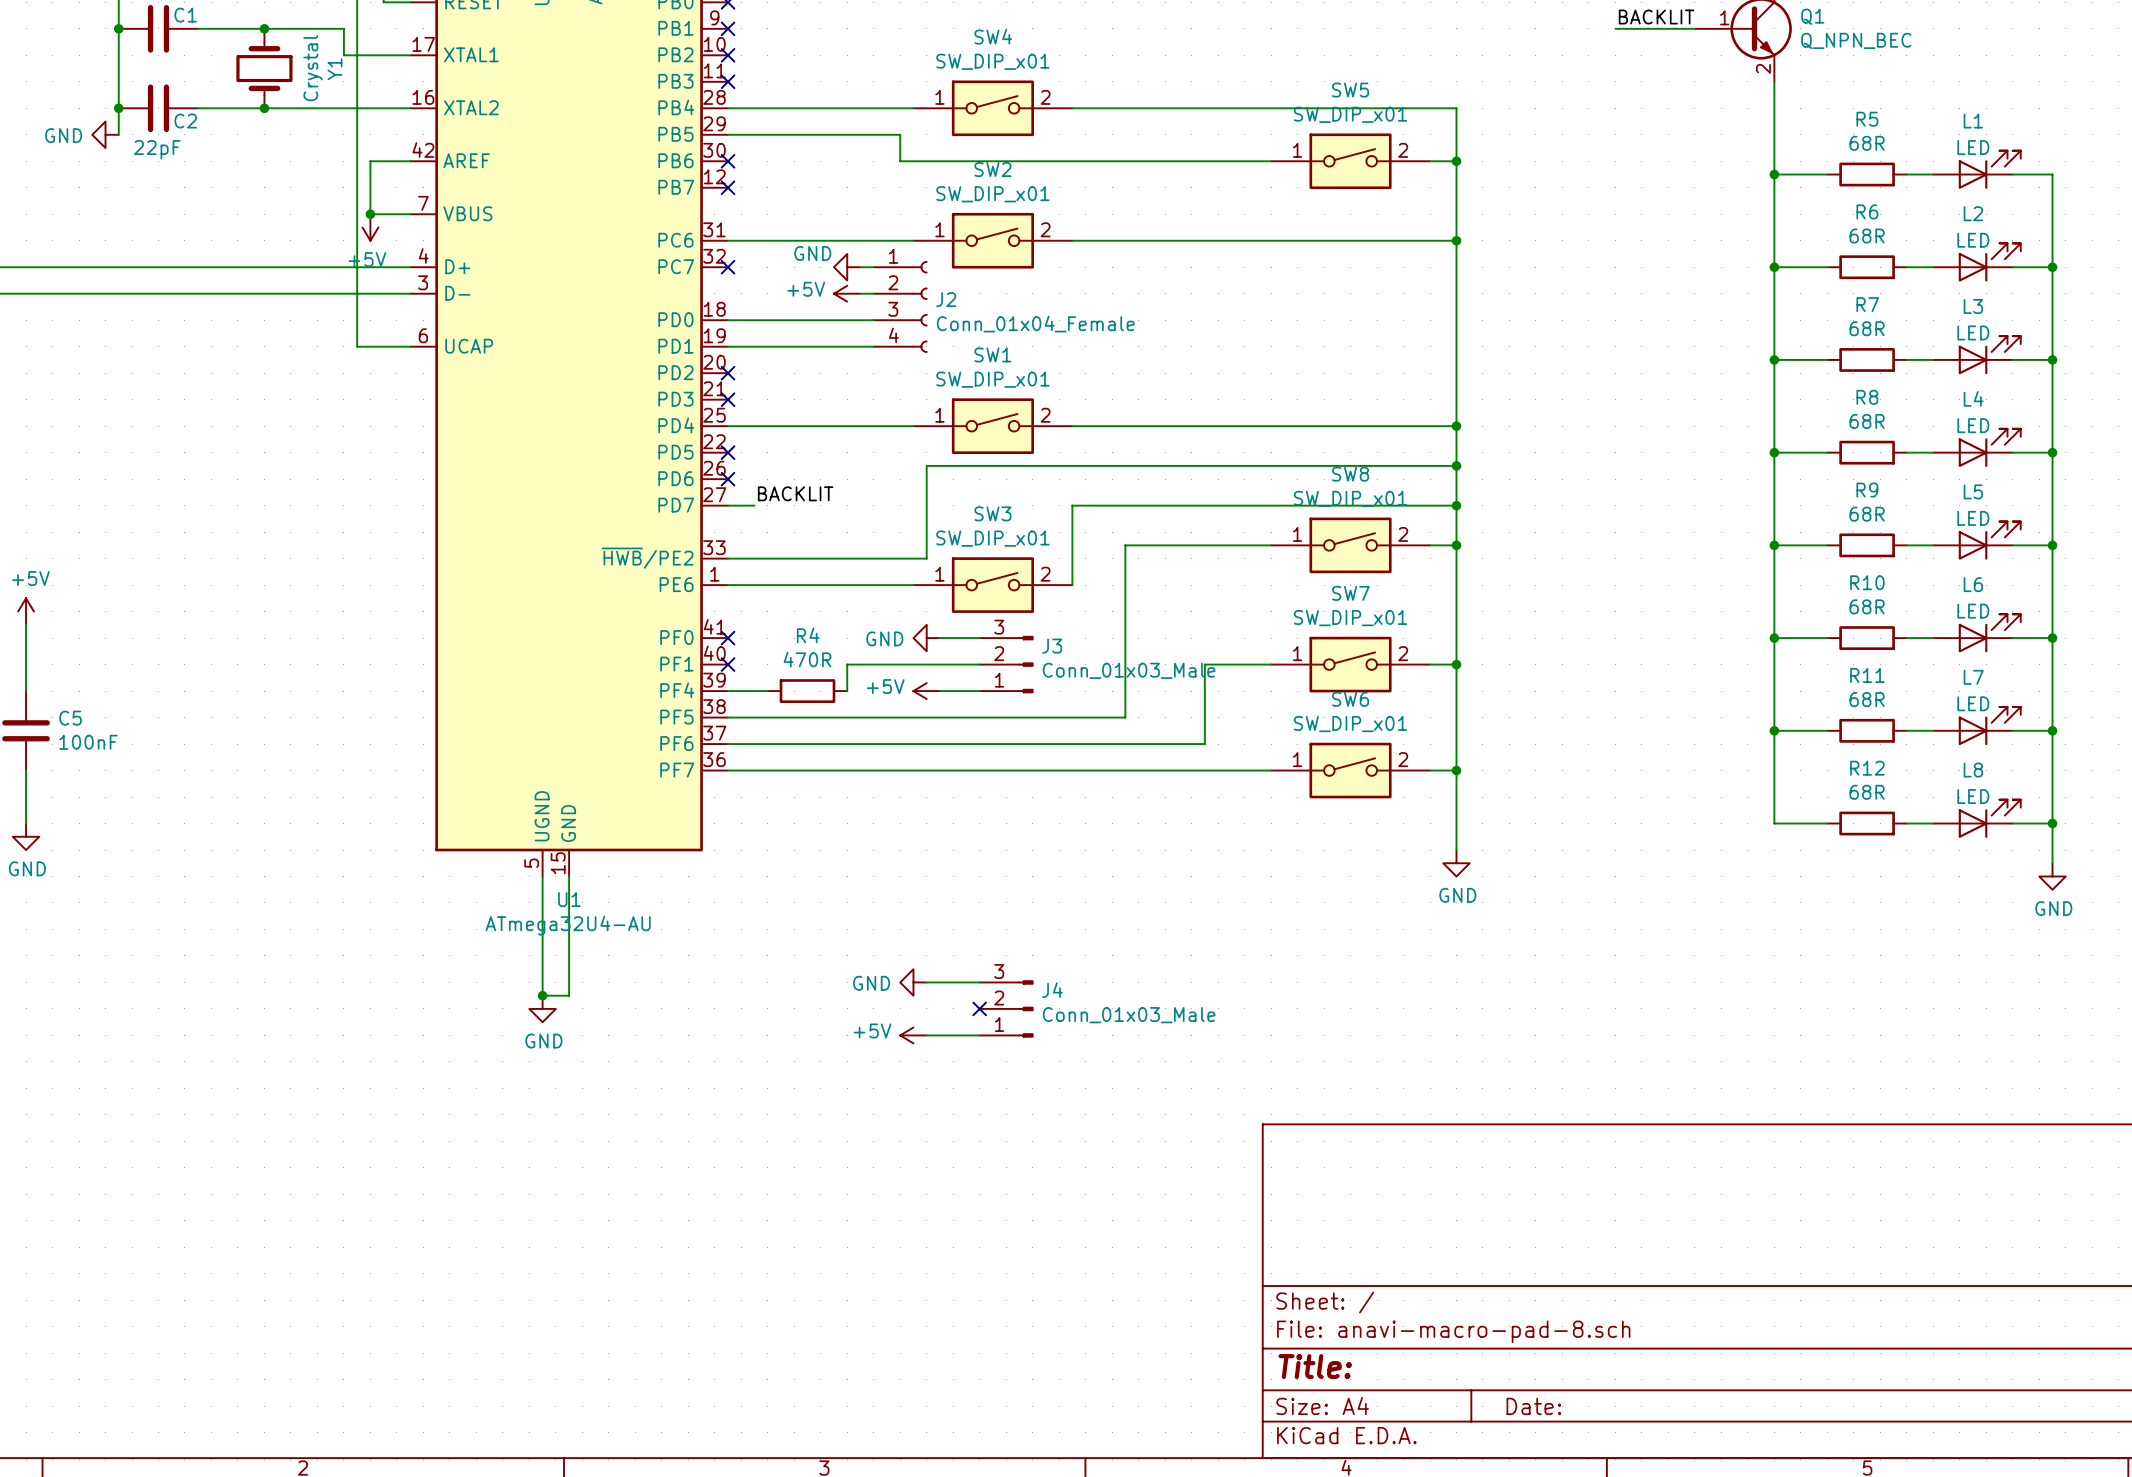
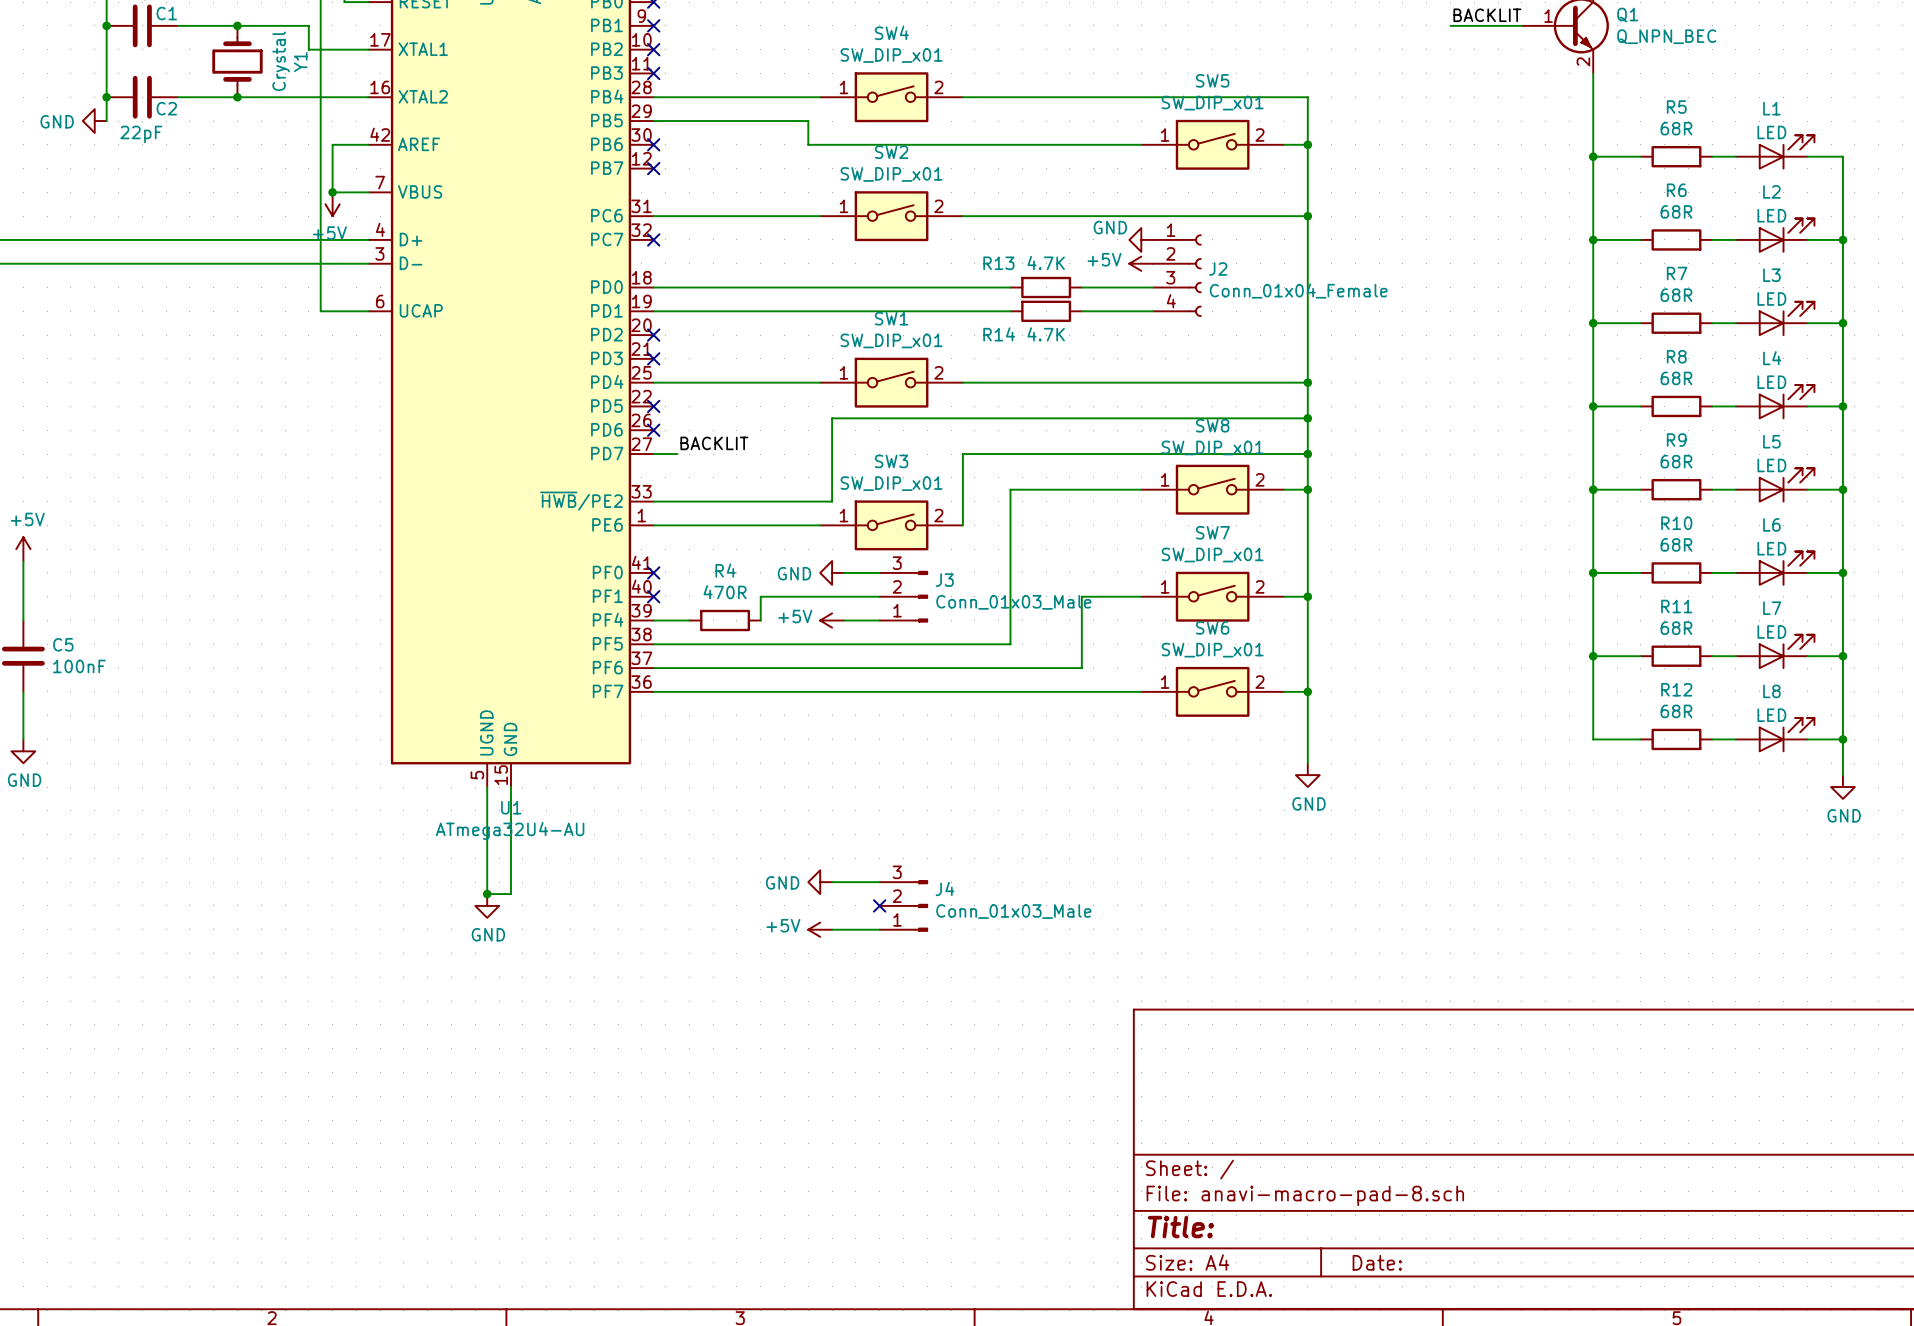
power symbol: GND (847, 267) -> none
wire: (860, 267) (873, 267) -> none
power symbol: none -> GND (1141, 239)
power symbol: +5V (847, 293) -> none
wire: (860, 293) (873, 293) -> none
power symbol: none -> +5V (1141, 263)
J2 position: (900, 306) -> (1177, 275)
wire: none -> (784, 287) (1010, 287)
R13: none -> 4.7K (1046, 287)
wire: none -> (1081, 287) (1153, 287)
wire: none -> (784, 311) (1010, 311)
R14: none -> 4.7K (1046, 311)
wire: none -> (1081, 311) (1153, 311)

